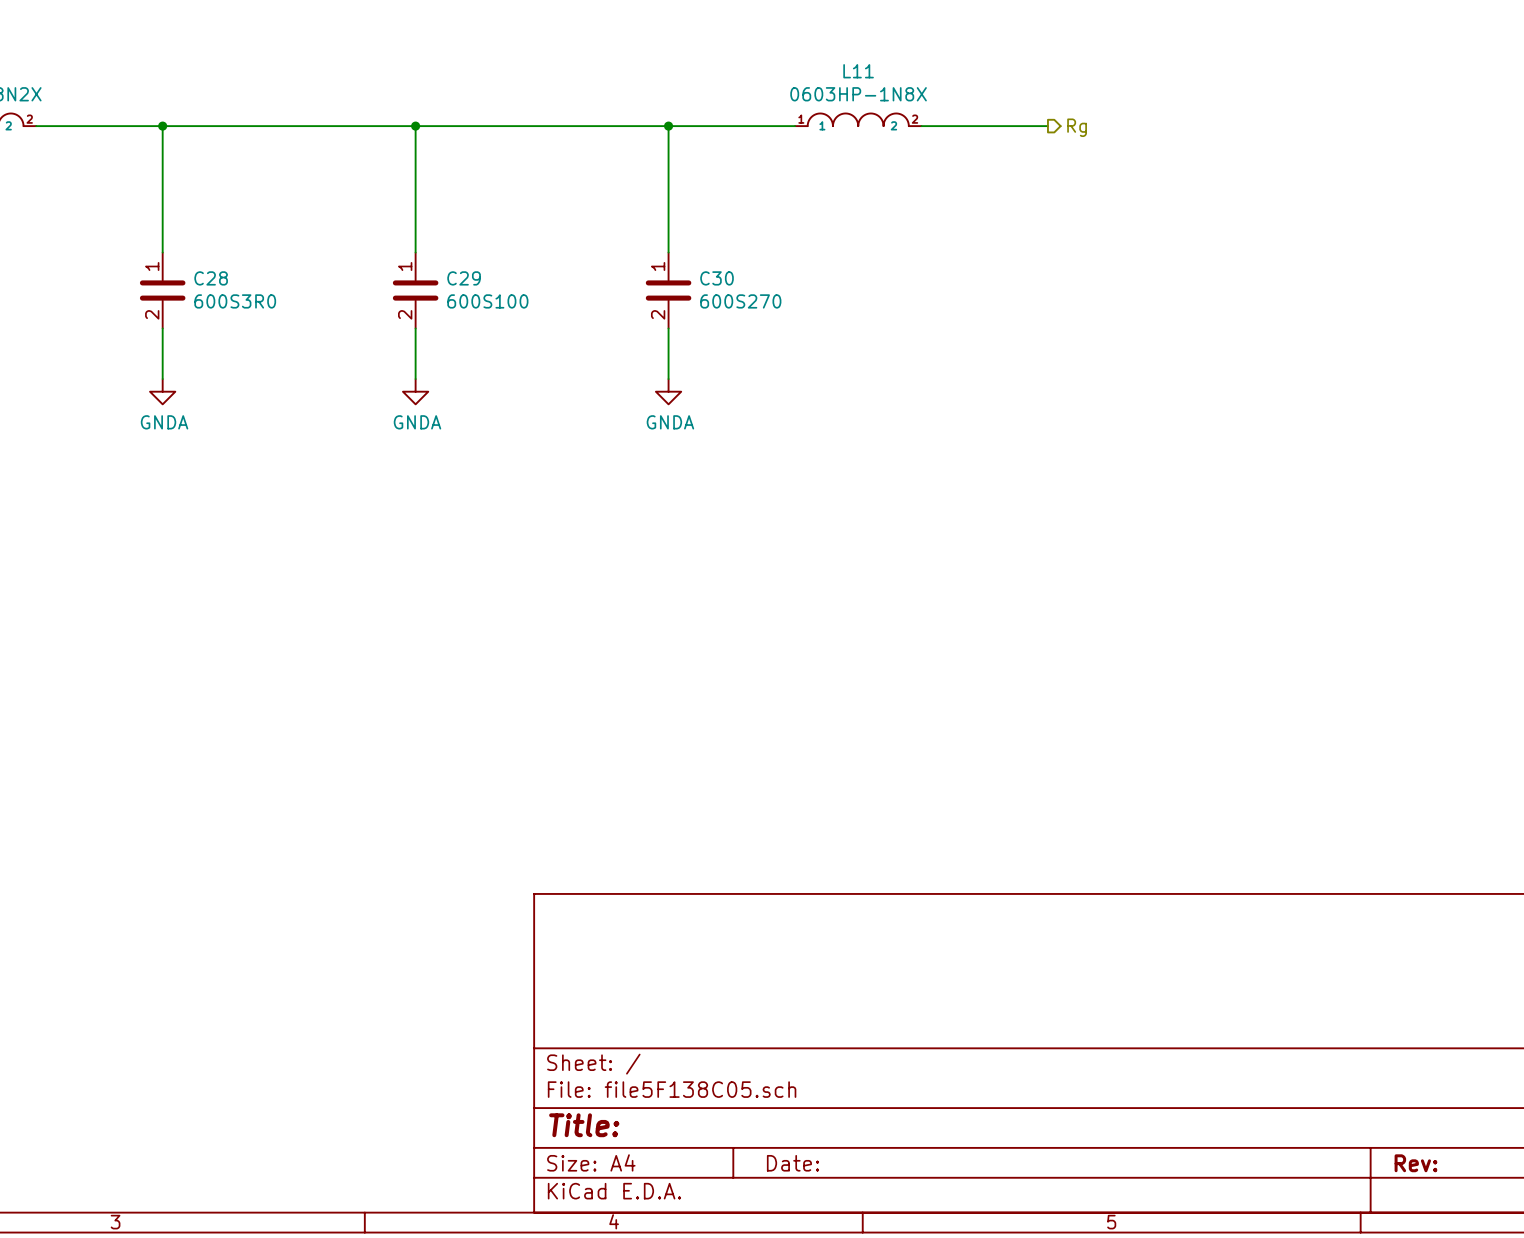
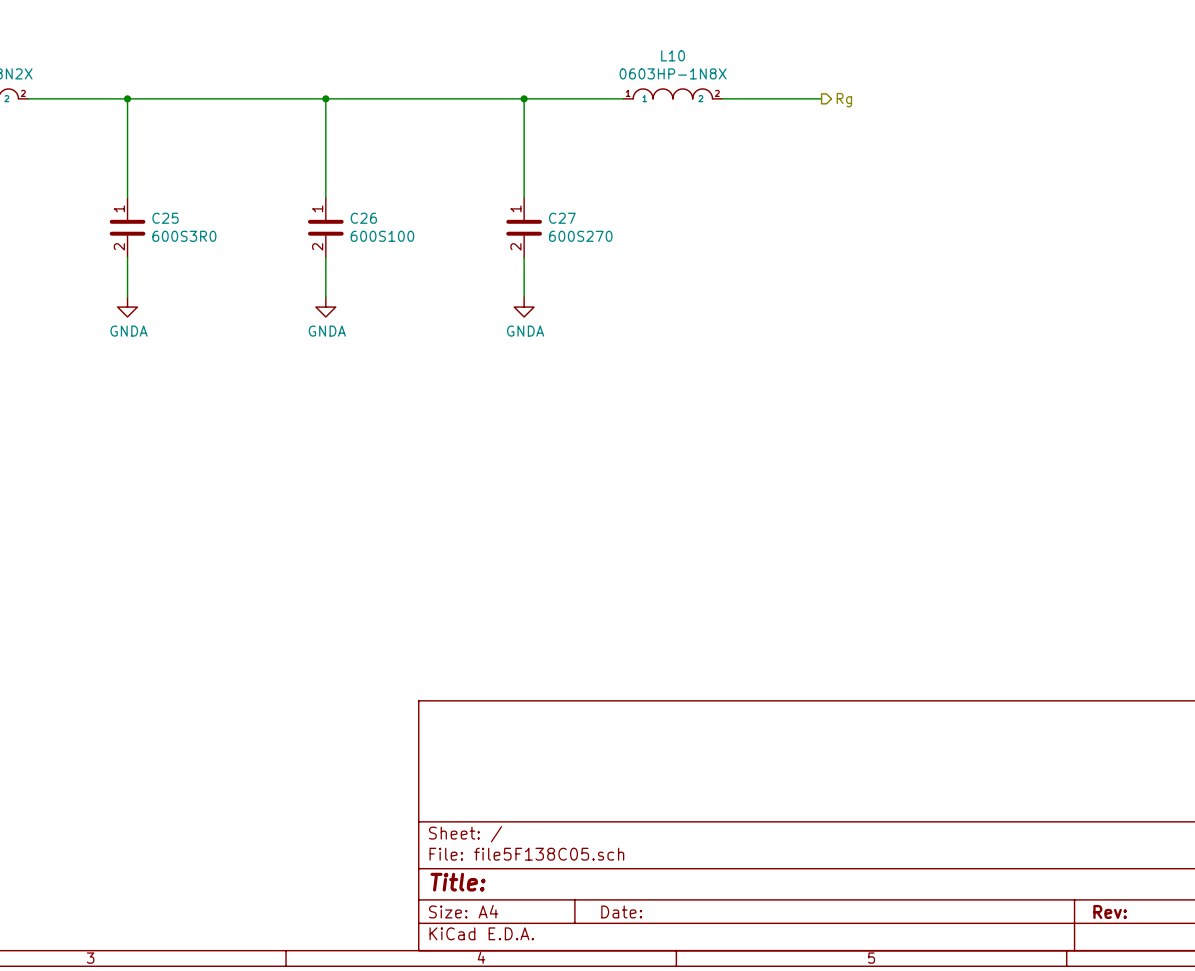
L11 name: L11 (858, 71) -> L10 (673, 55)
C28 name: C28 (211, 278) -> C25 (165, 218)
C29 name: C29 (464, 278) -> C26 (363, 218)
C30 name: C30 (717, 278) -> C27 (562, 218)

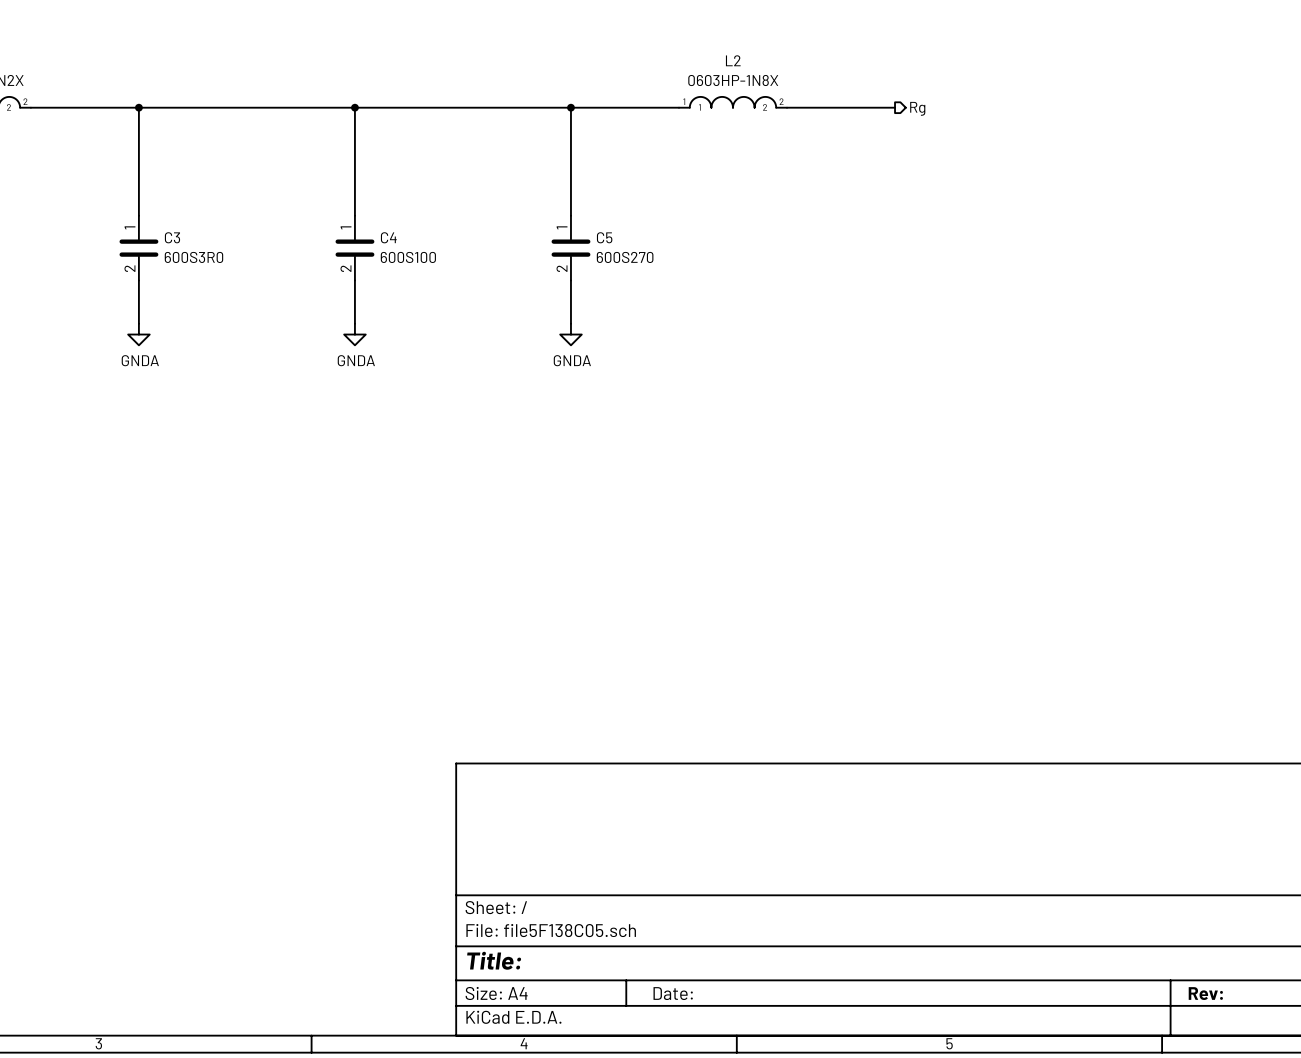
L10 name: L10 (673, 55) -> L2 (733, 60)
C25 name: C25 (165, 218) -> C3 (172, 237)
C26 name: C26 (363, 218) -> C4 (388, 237)
C27 name: C27 (562, 218) -> C5 (604, 237)

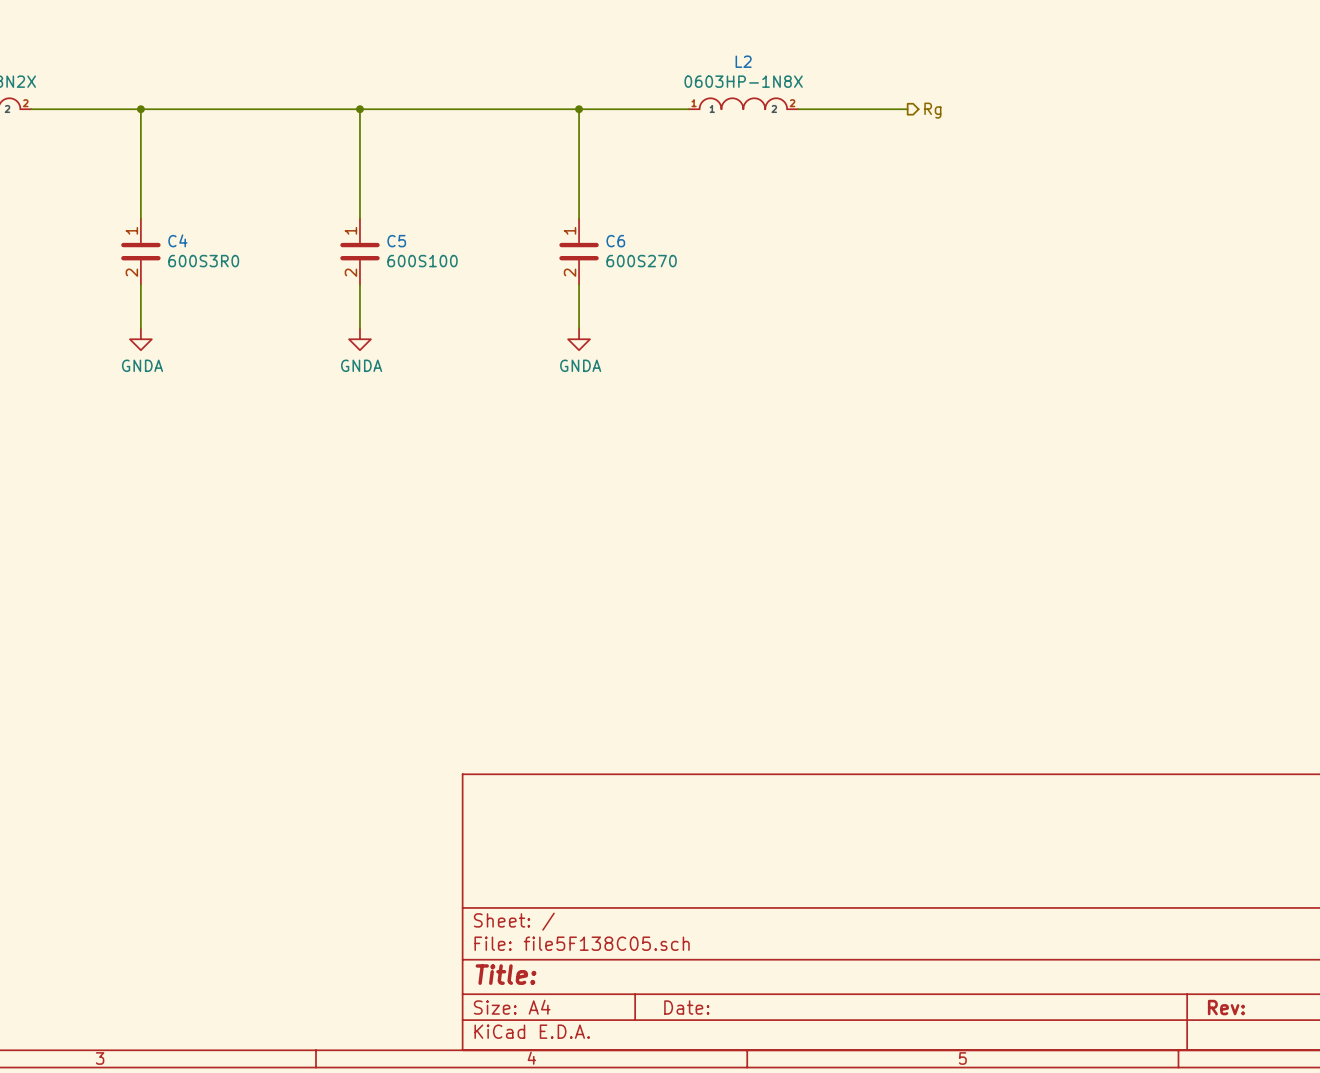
C3 name: C3 (172, 237) -> C4 (177, 240)
C4 name: C4 (388, 237) -> C5 (396, 241)
C5 name: C5 (604, 237) -> C6 (615, 241)

